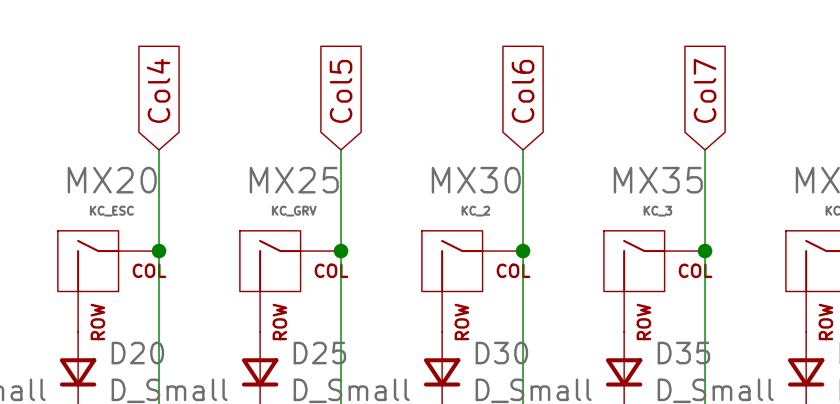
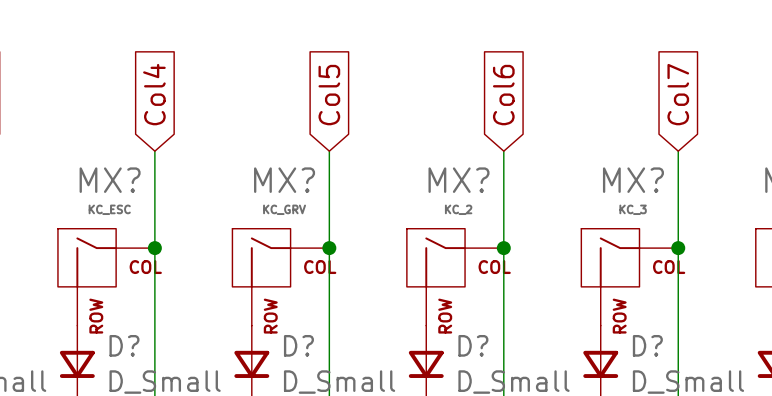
MX20 name: MX20 (112, 180) -> MX? (110, 180)
MX25 name: MX25 (294, 180) -> MX? (284, 180)
MX30 name: MX30 (476, 180) -> MX? (459, 180)
MX35 name: MX35 (658, 180) -> MX? (633, 180)
D20 name: D20 (137, 353) -> D? (124, 345)
D25 name: D25 (319, 353) -> D? (298, 345)
D30 name: D30 (501, 353) -> D? (473, 345)
D35 name: D35 (683, 353) -> D? (647, 345)

